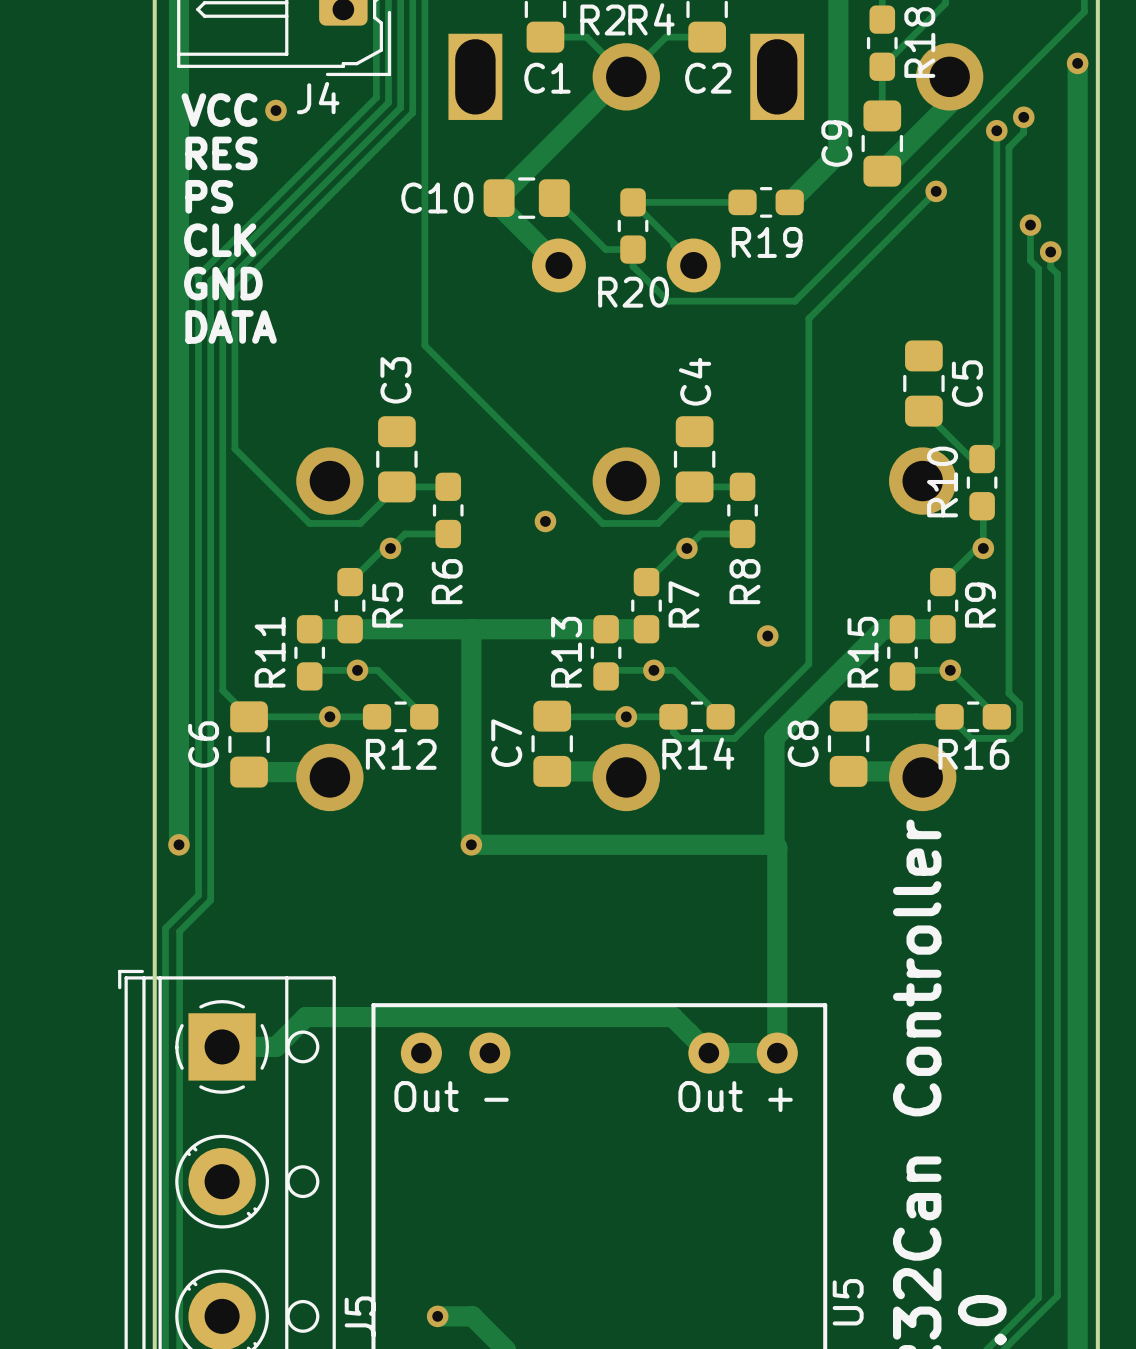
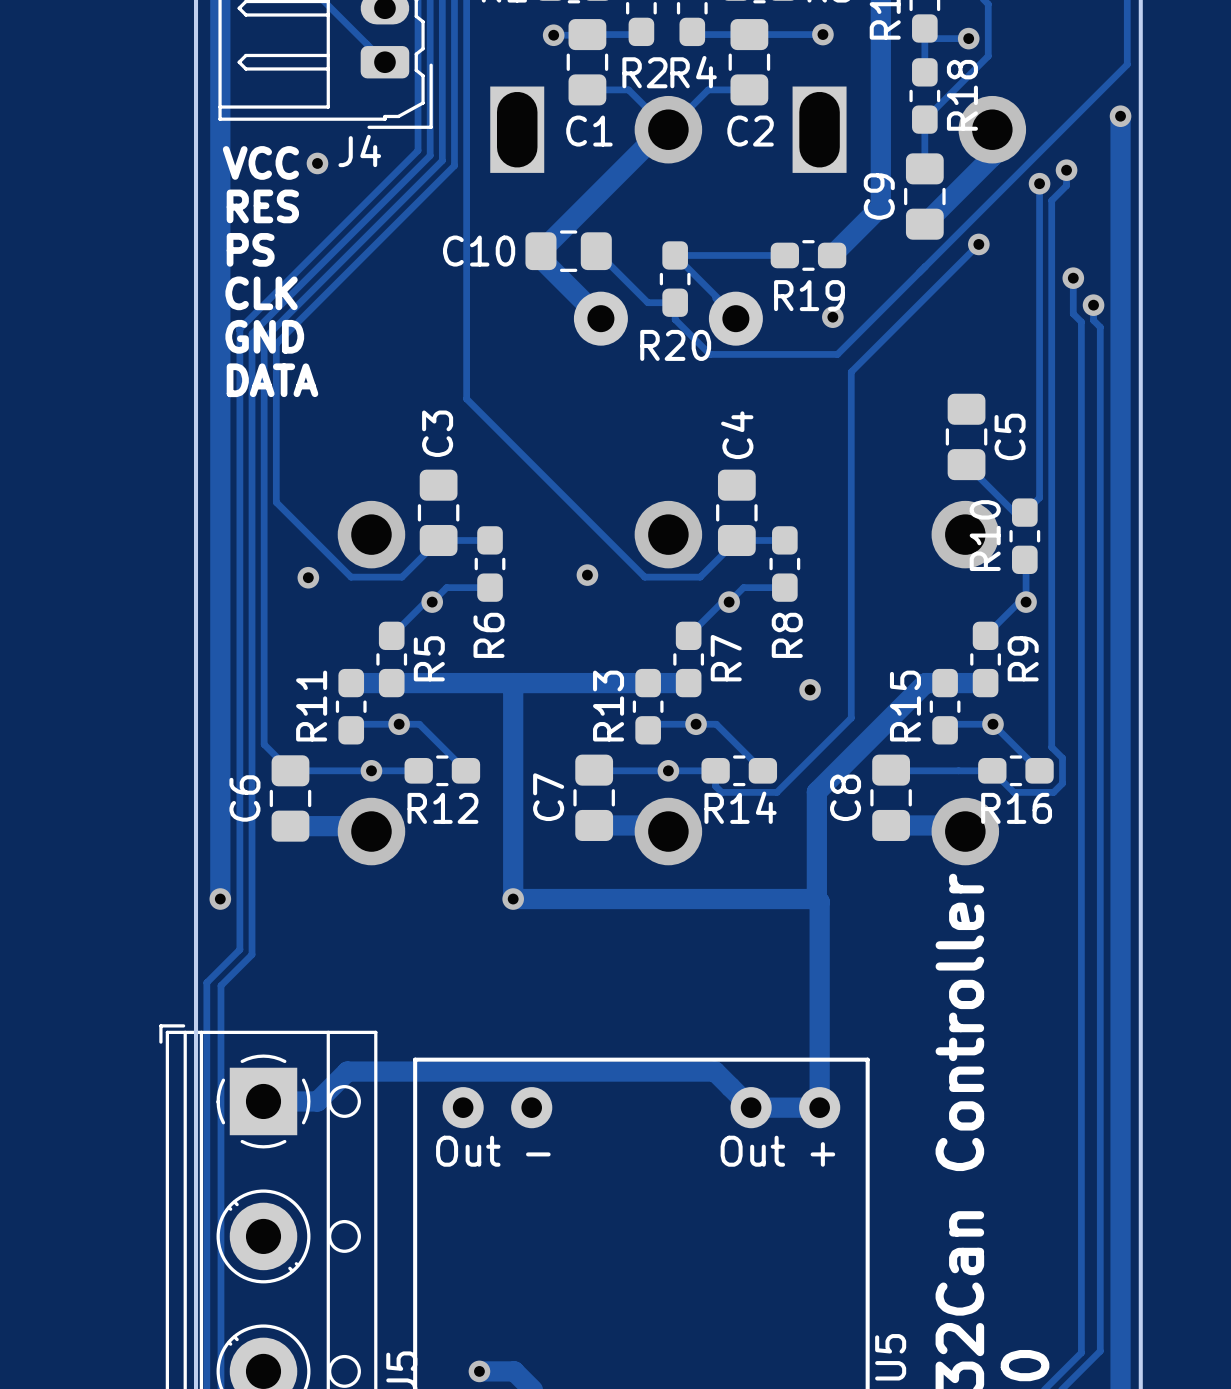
via: none -> (832, 317)
via: none -> (308, 577)

